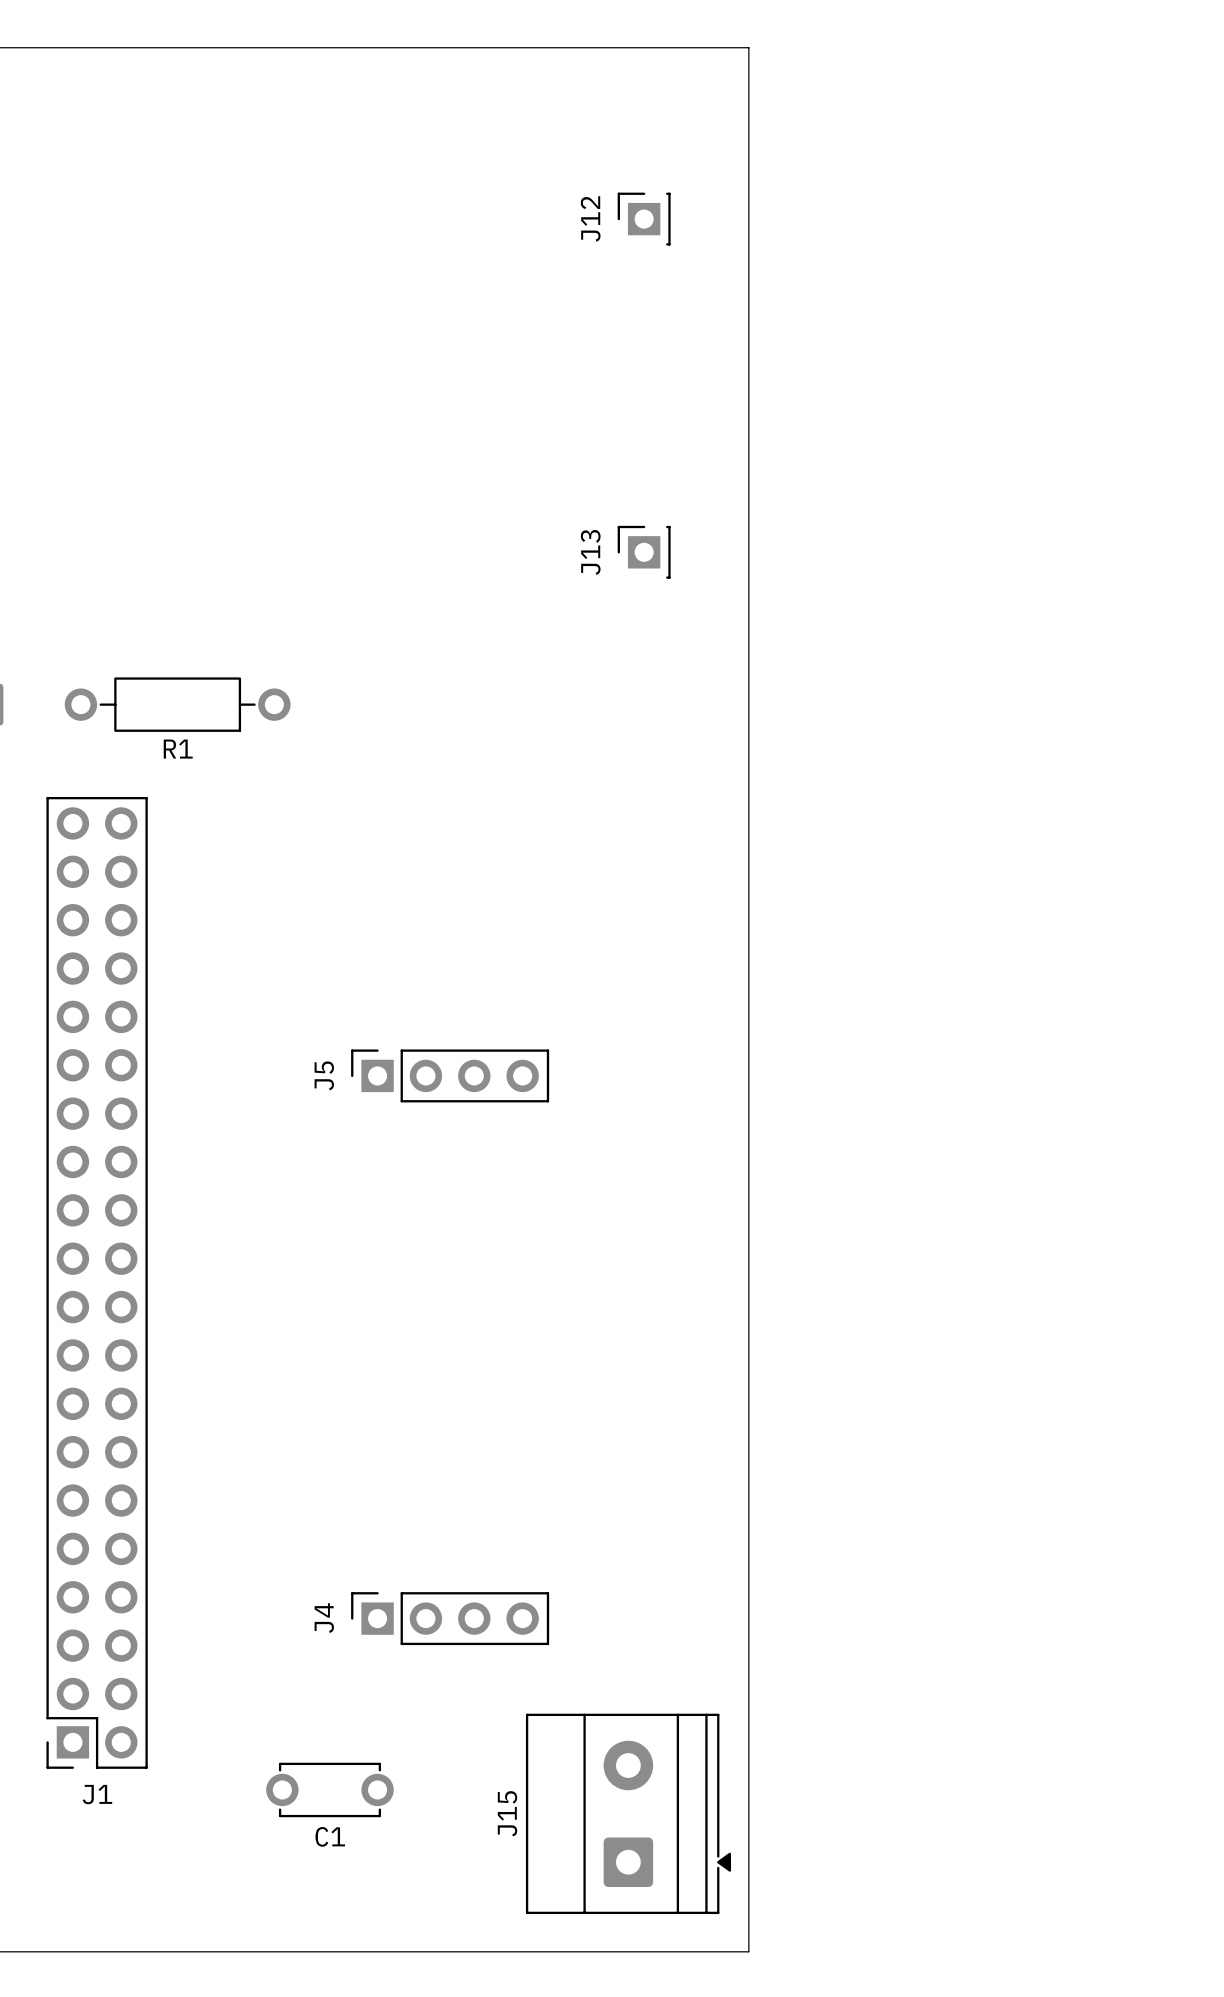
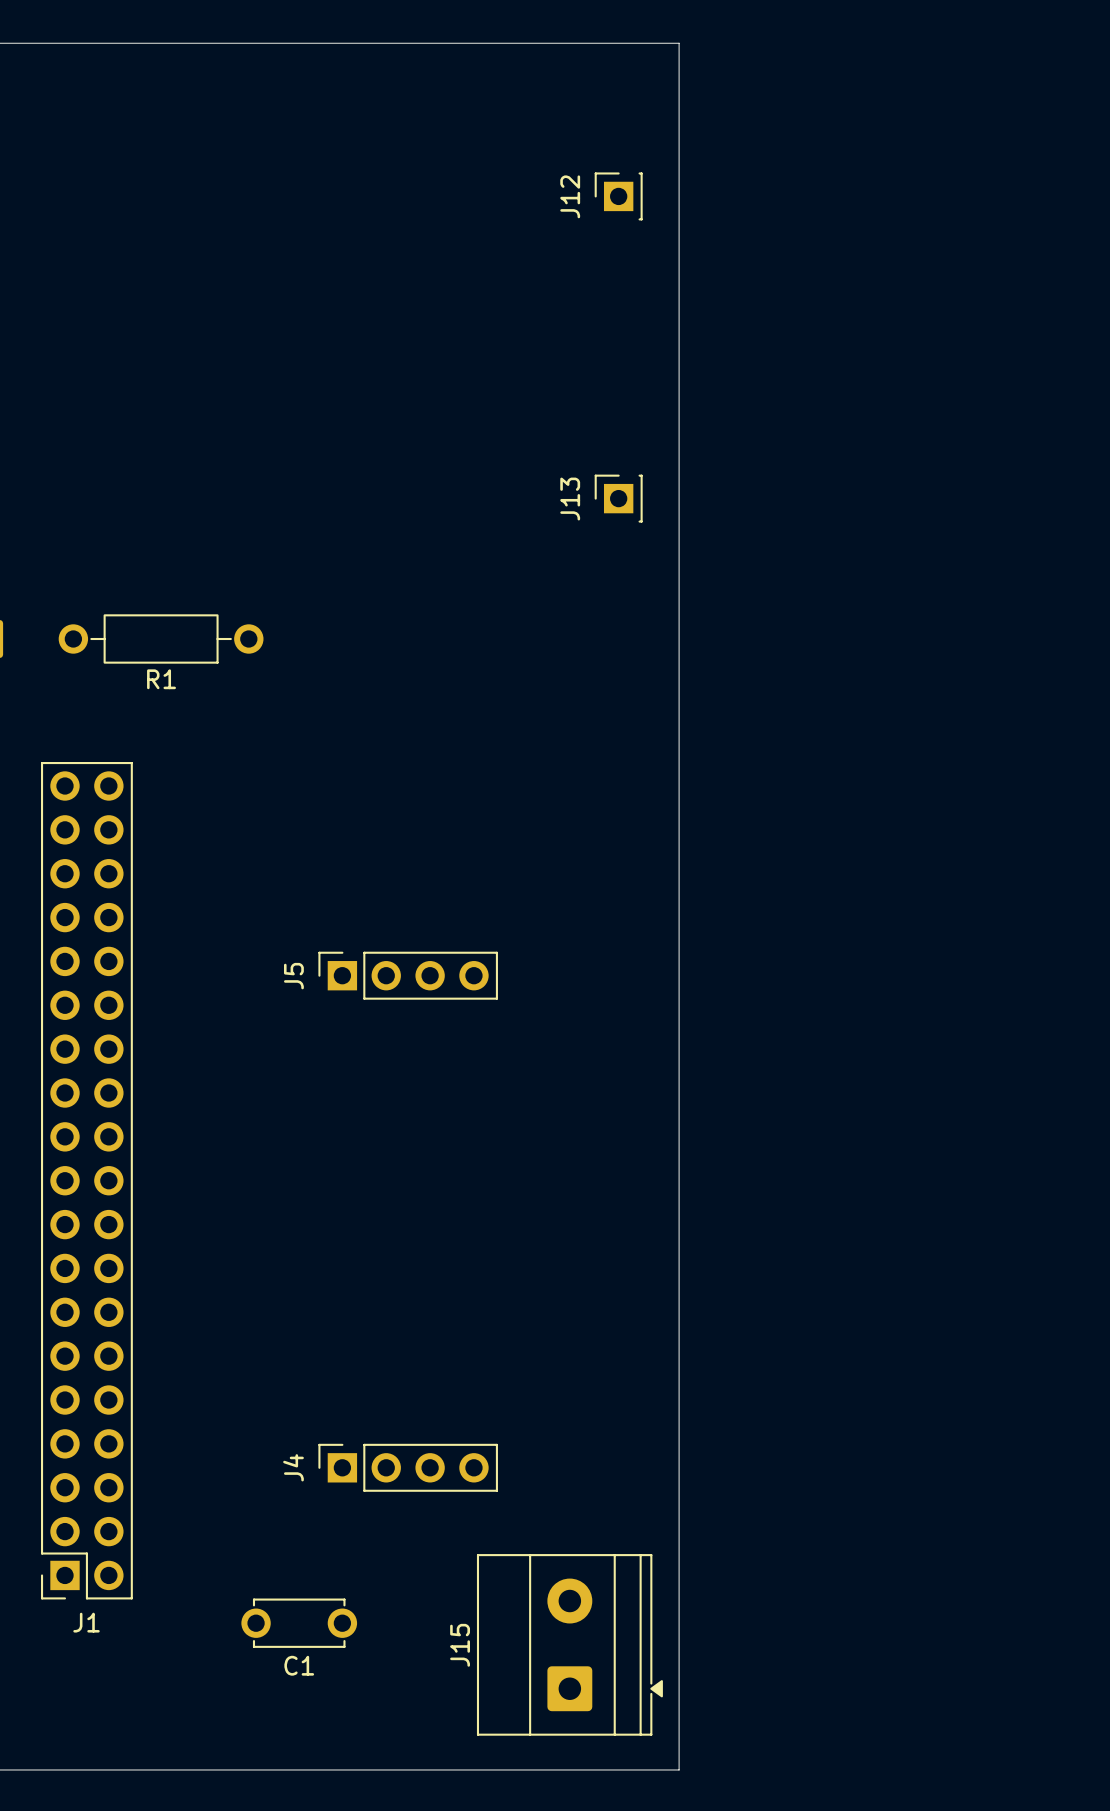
J12 position: (644, 219) -> (618, 196)
J13 position: (644, 552) -> (618, 498)
J1 footprint: [46, 796, 148, 1769] -> [41, 762, 133, 1600]

